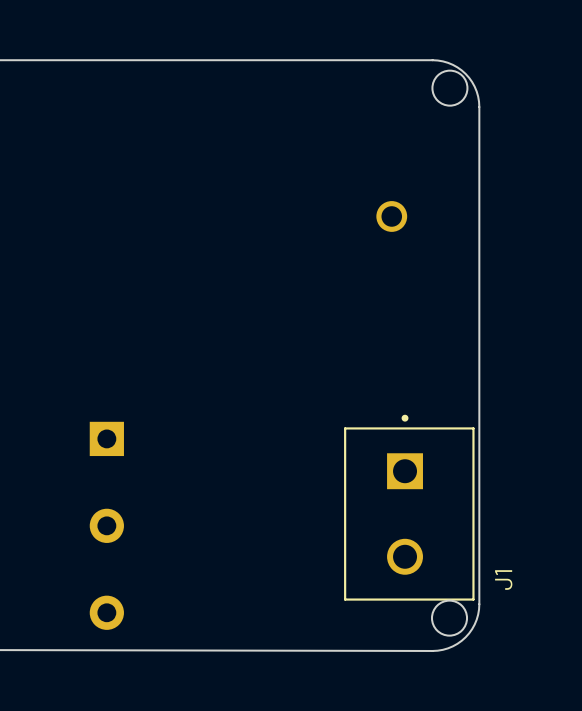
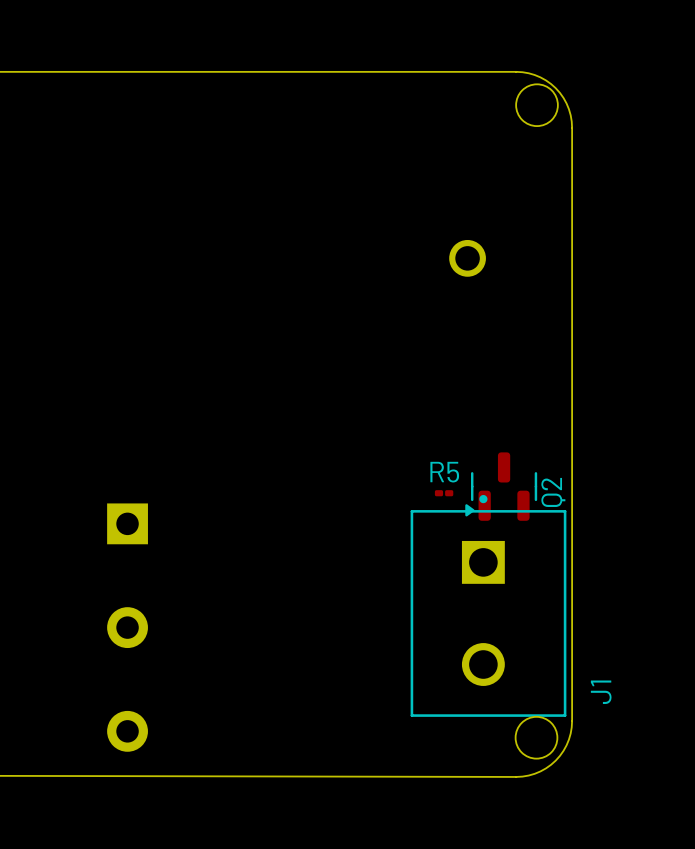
Q2: none -> (501, 486)
R5: none -> (444, 493)

